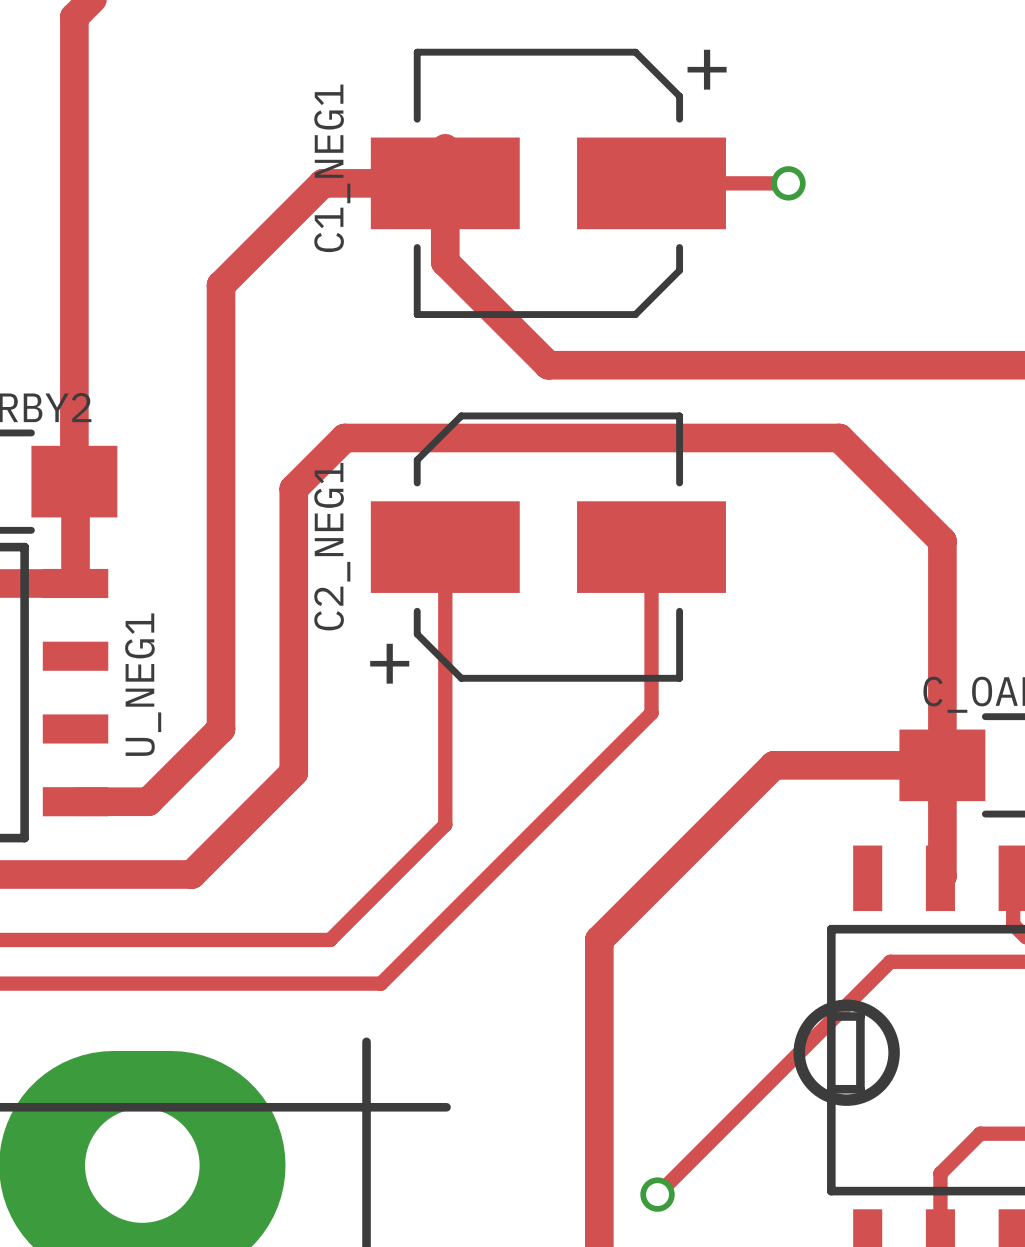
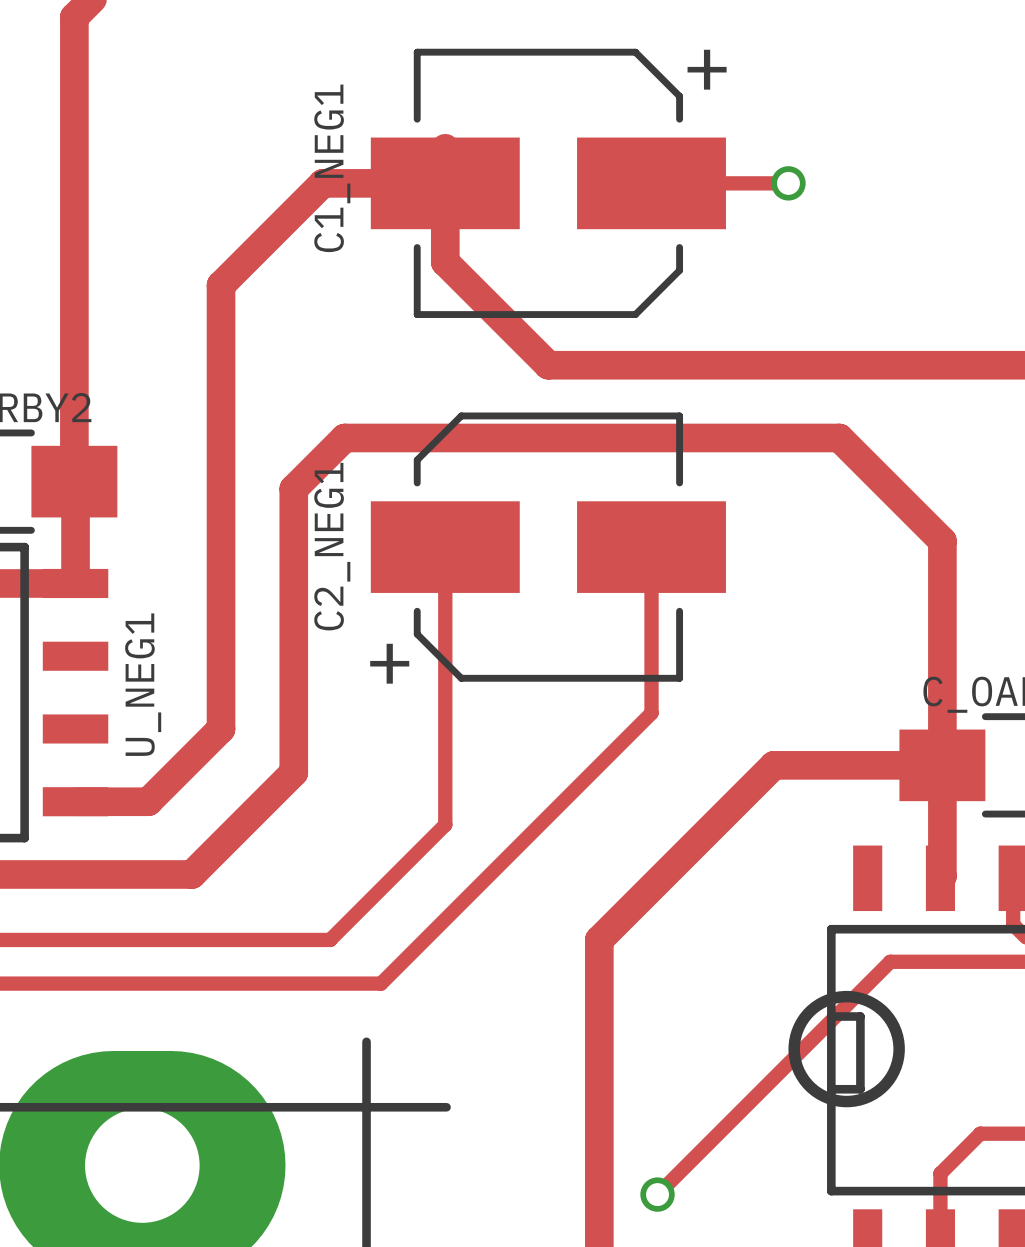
drawing shape: [793, 999, 900, 1106] -> [788, 990, 905, 1108]

